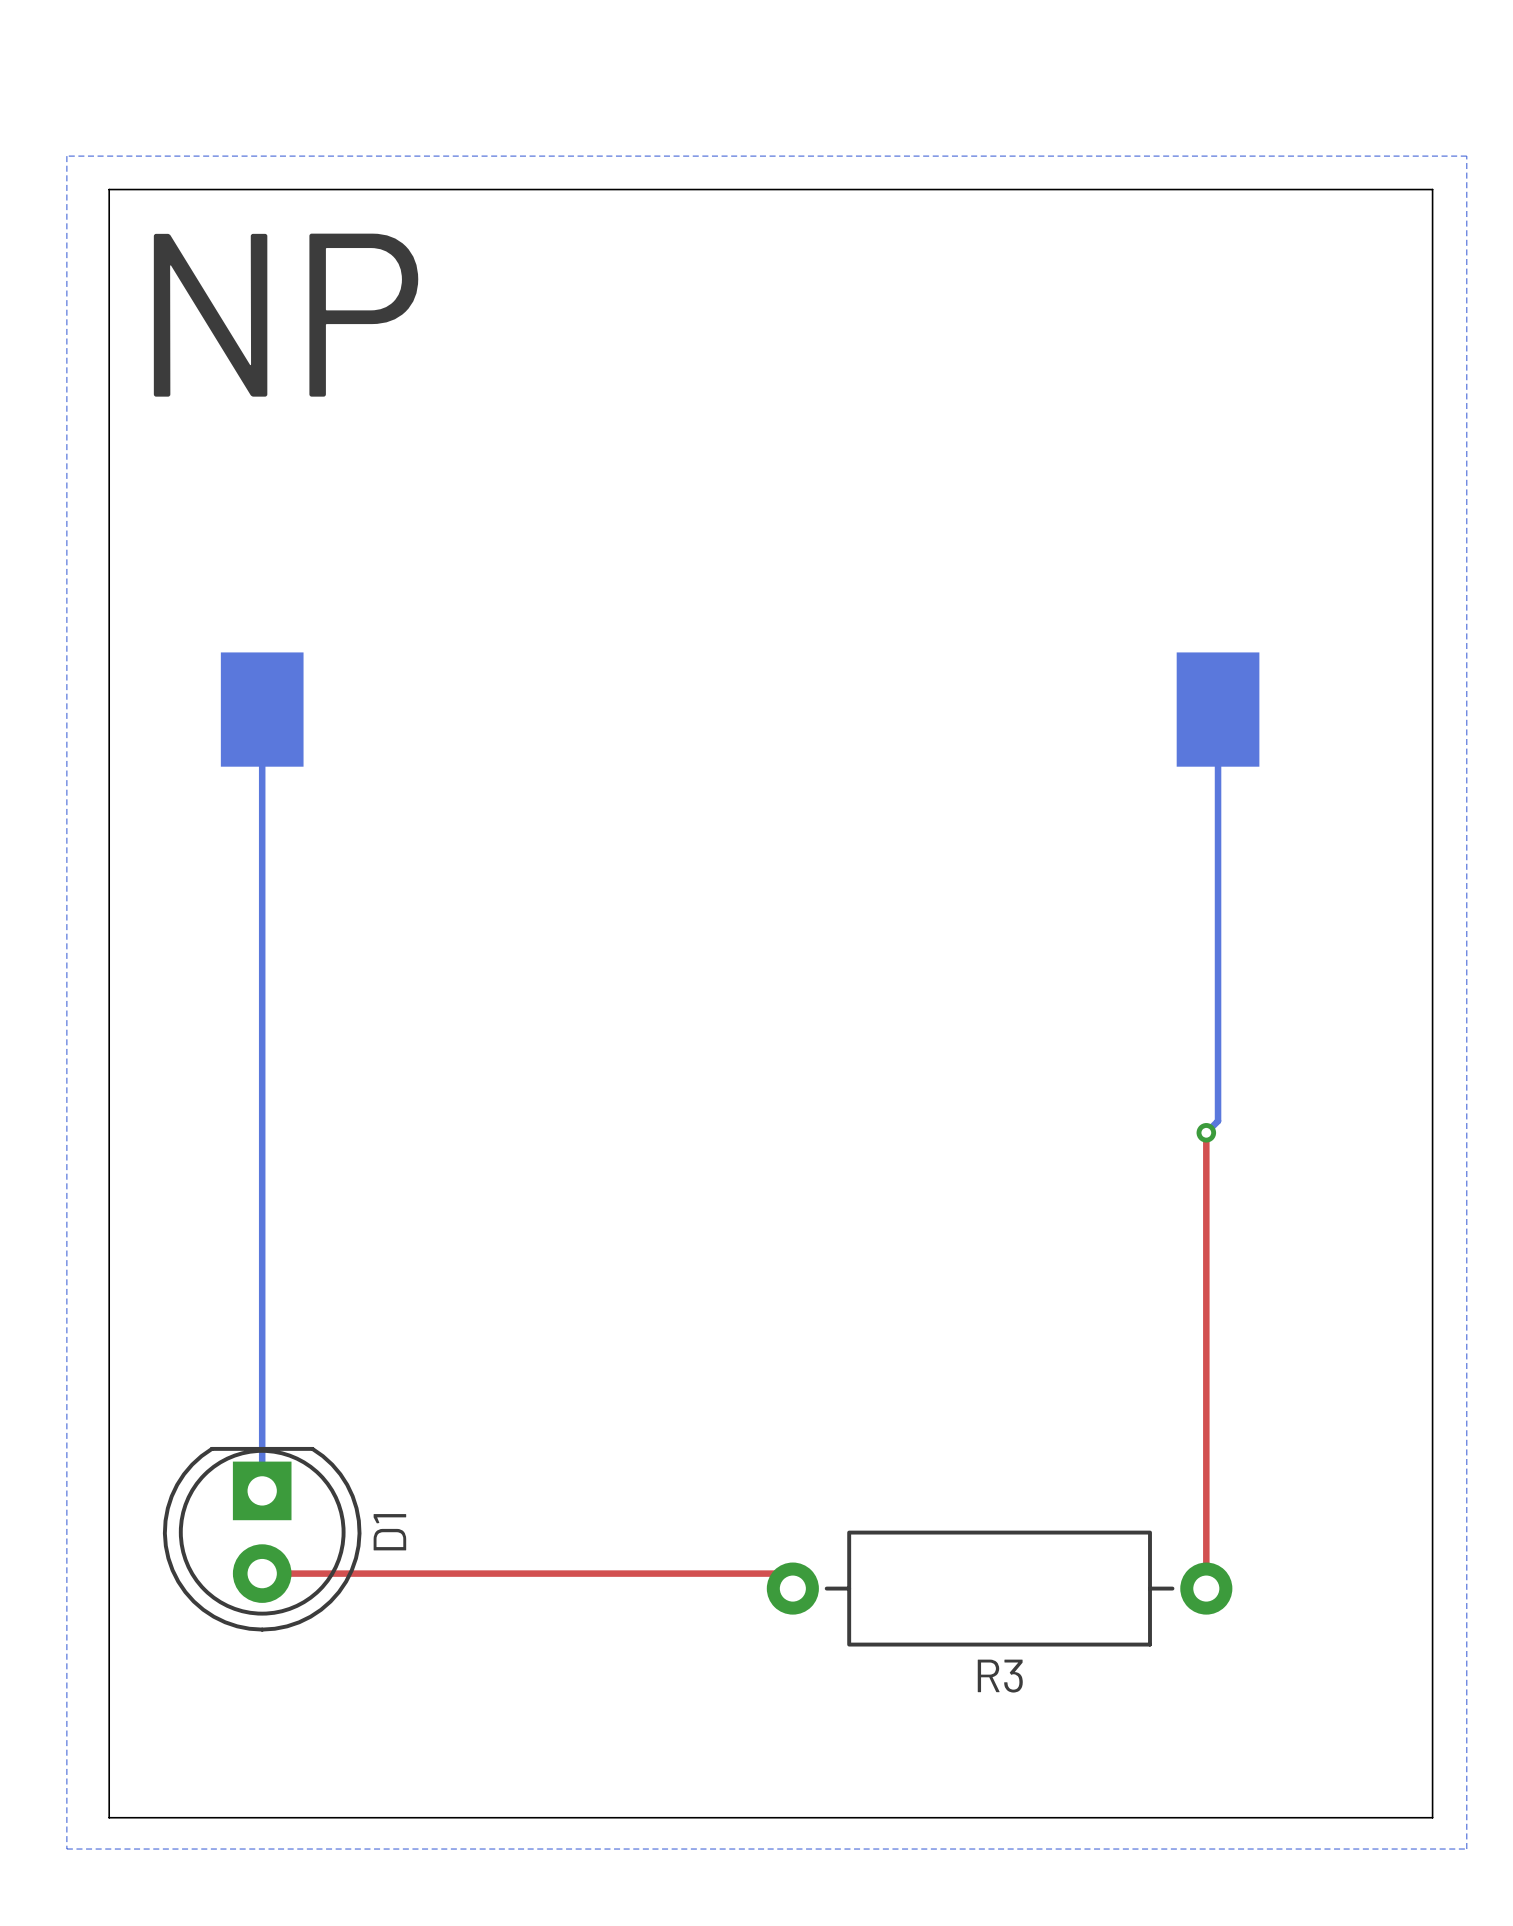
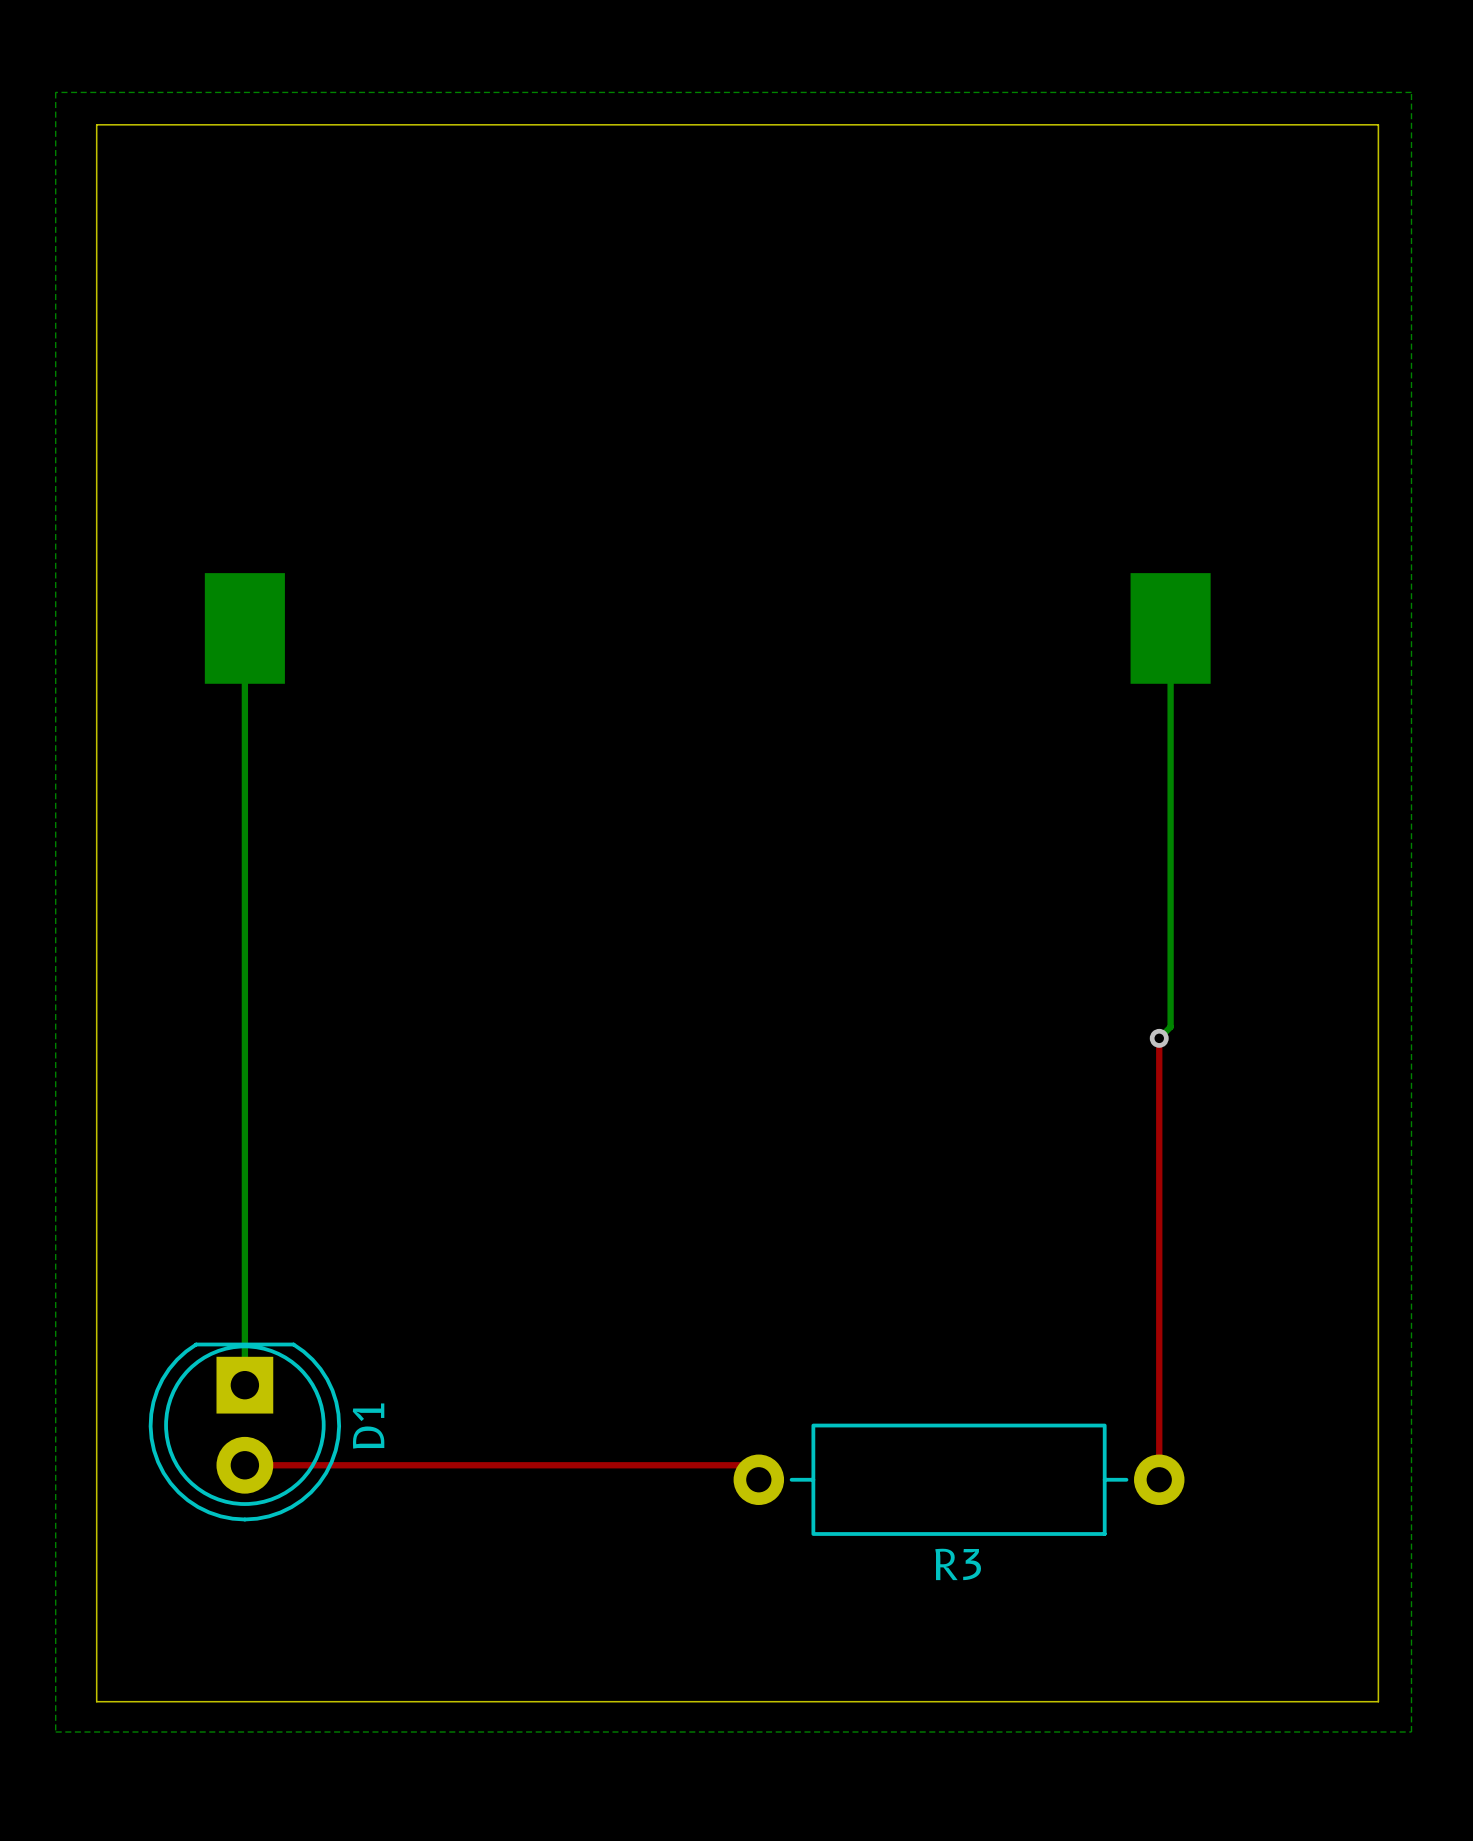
text: NP (286, 315) -> none

